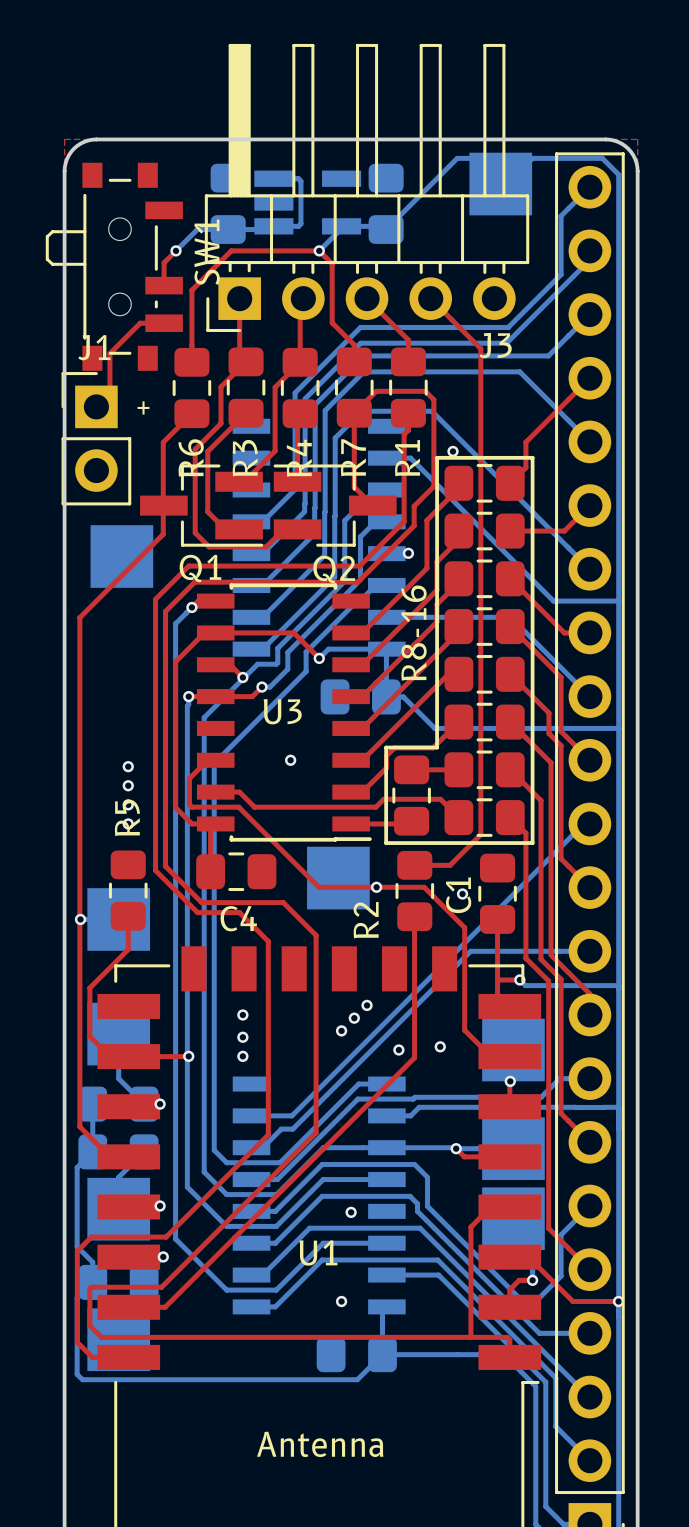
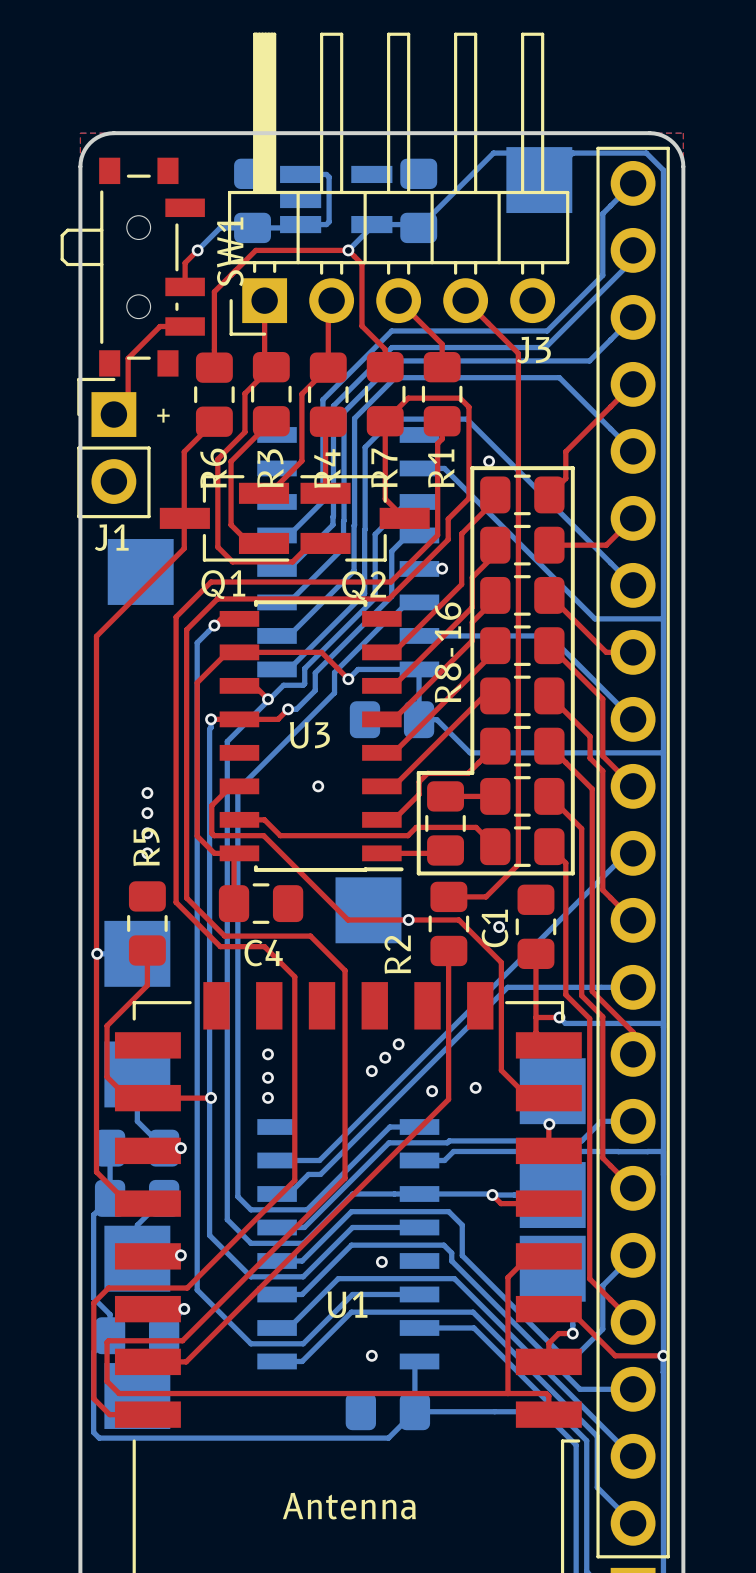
J1 name position: J1 (94, 347) -> J1 (111, 537)

